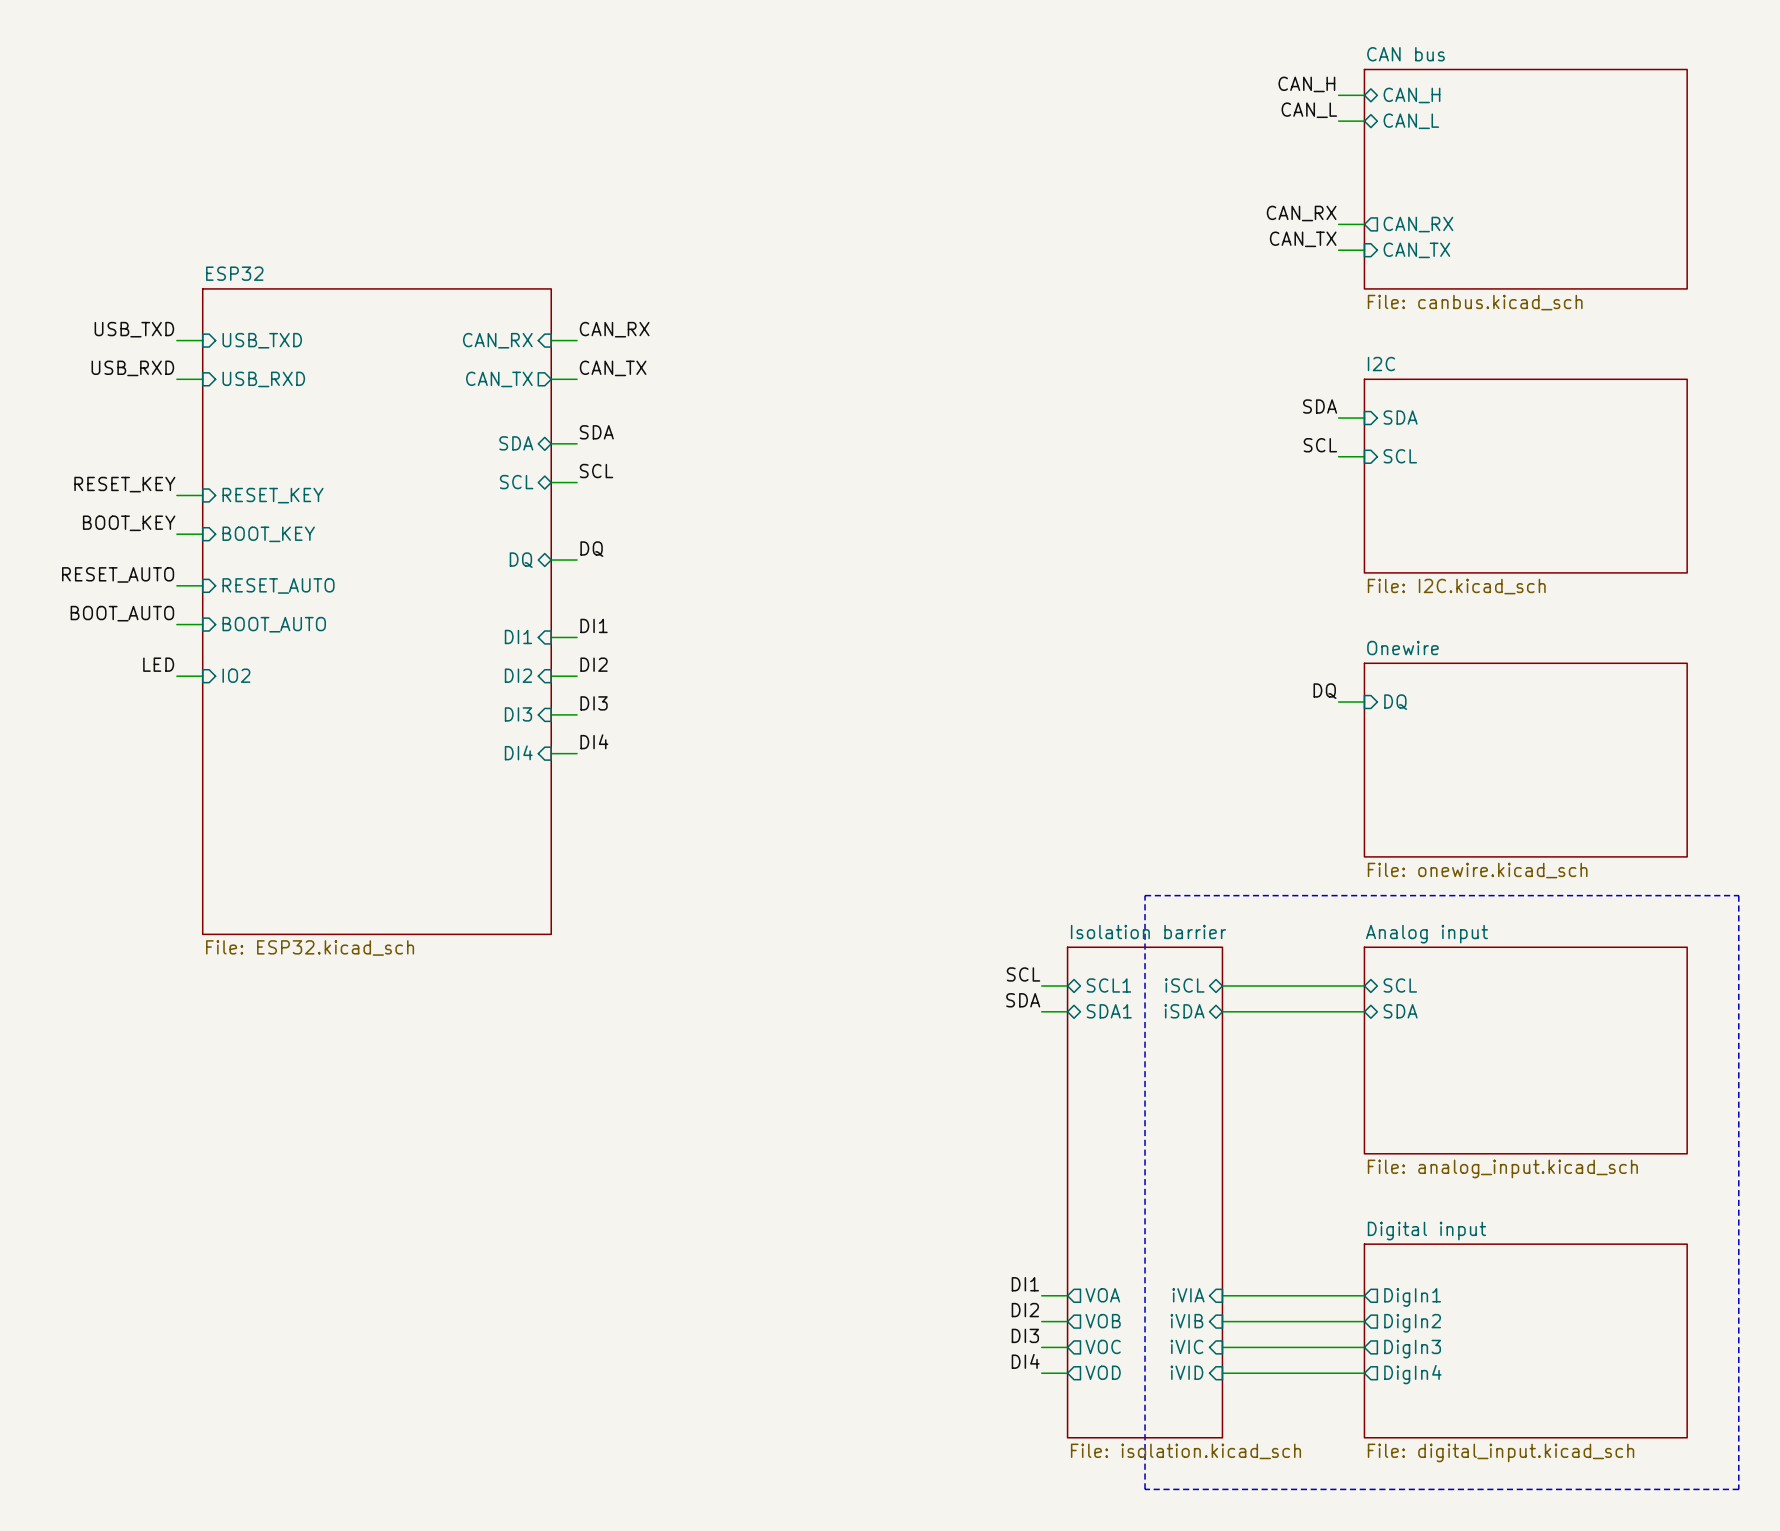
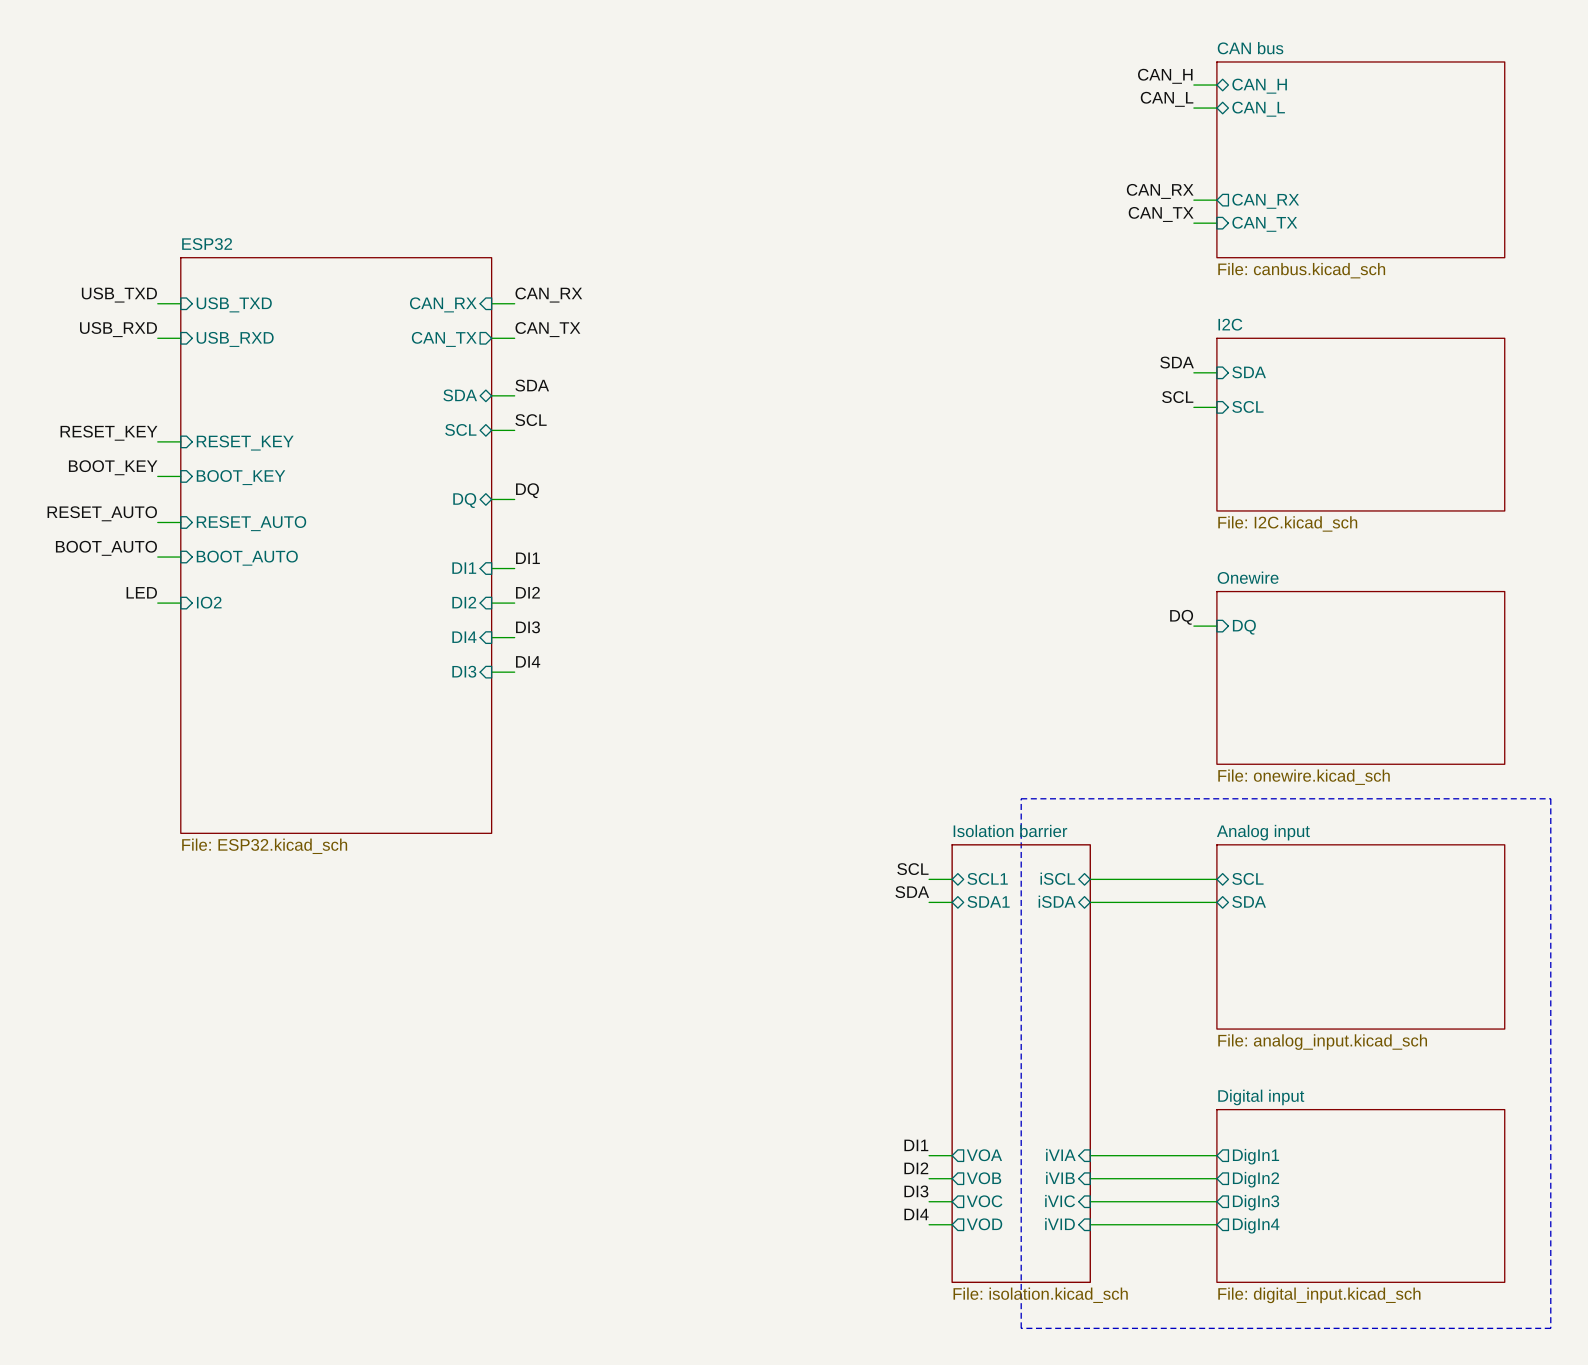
sheet pin: DI3 (518, 714) -> DI4 (464, 637)
sheet pin: DI4 (518, 752) -> DI3 (464, 671)

